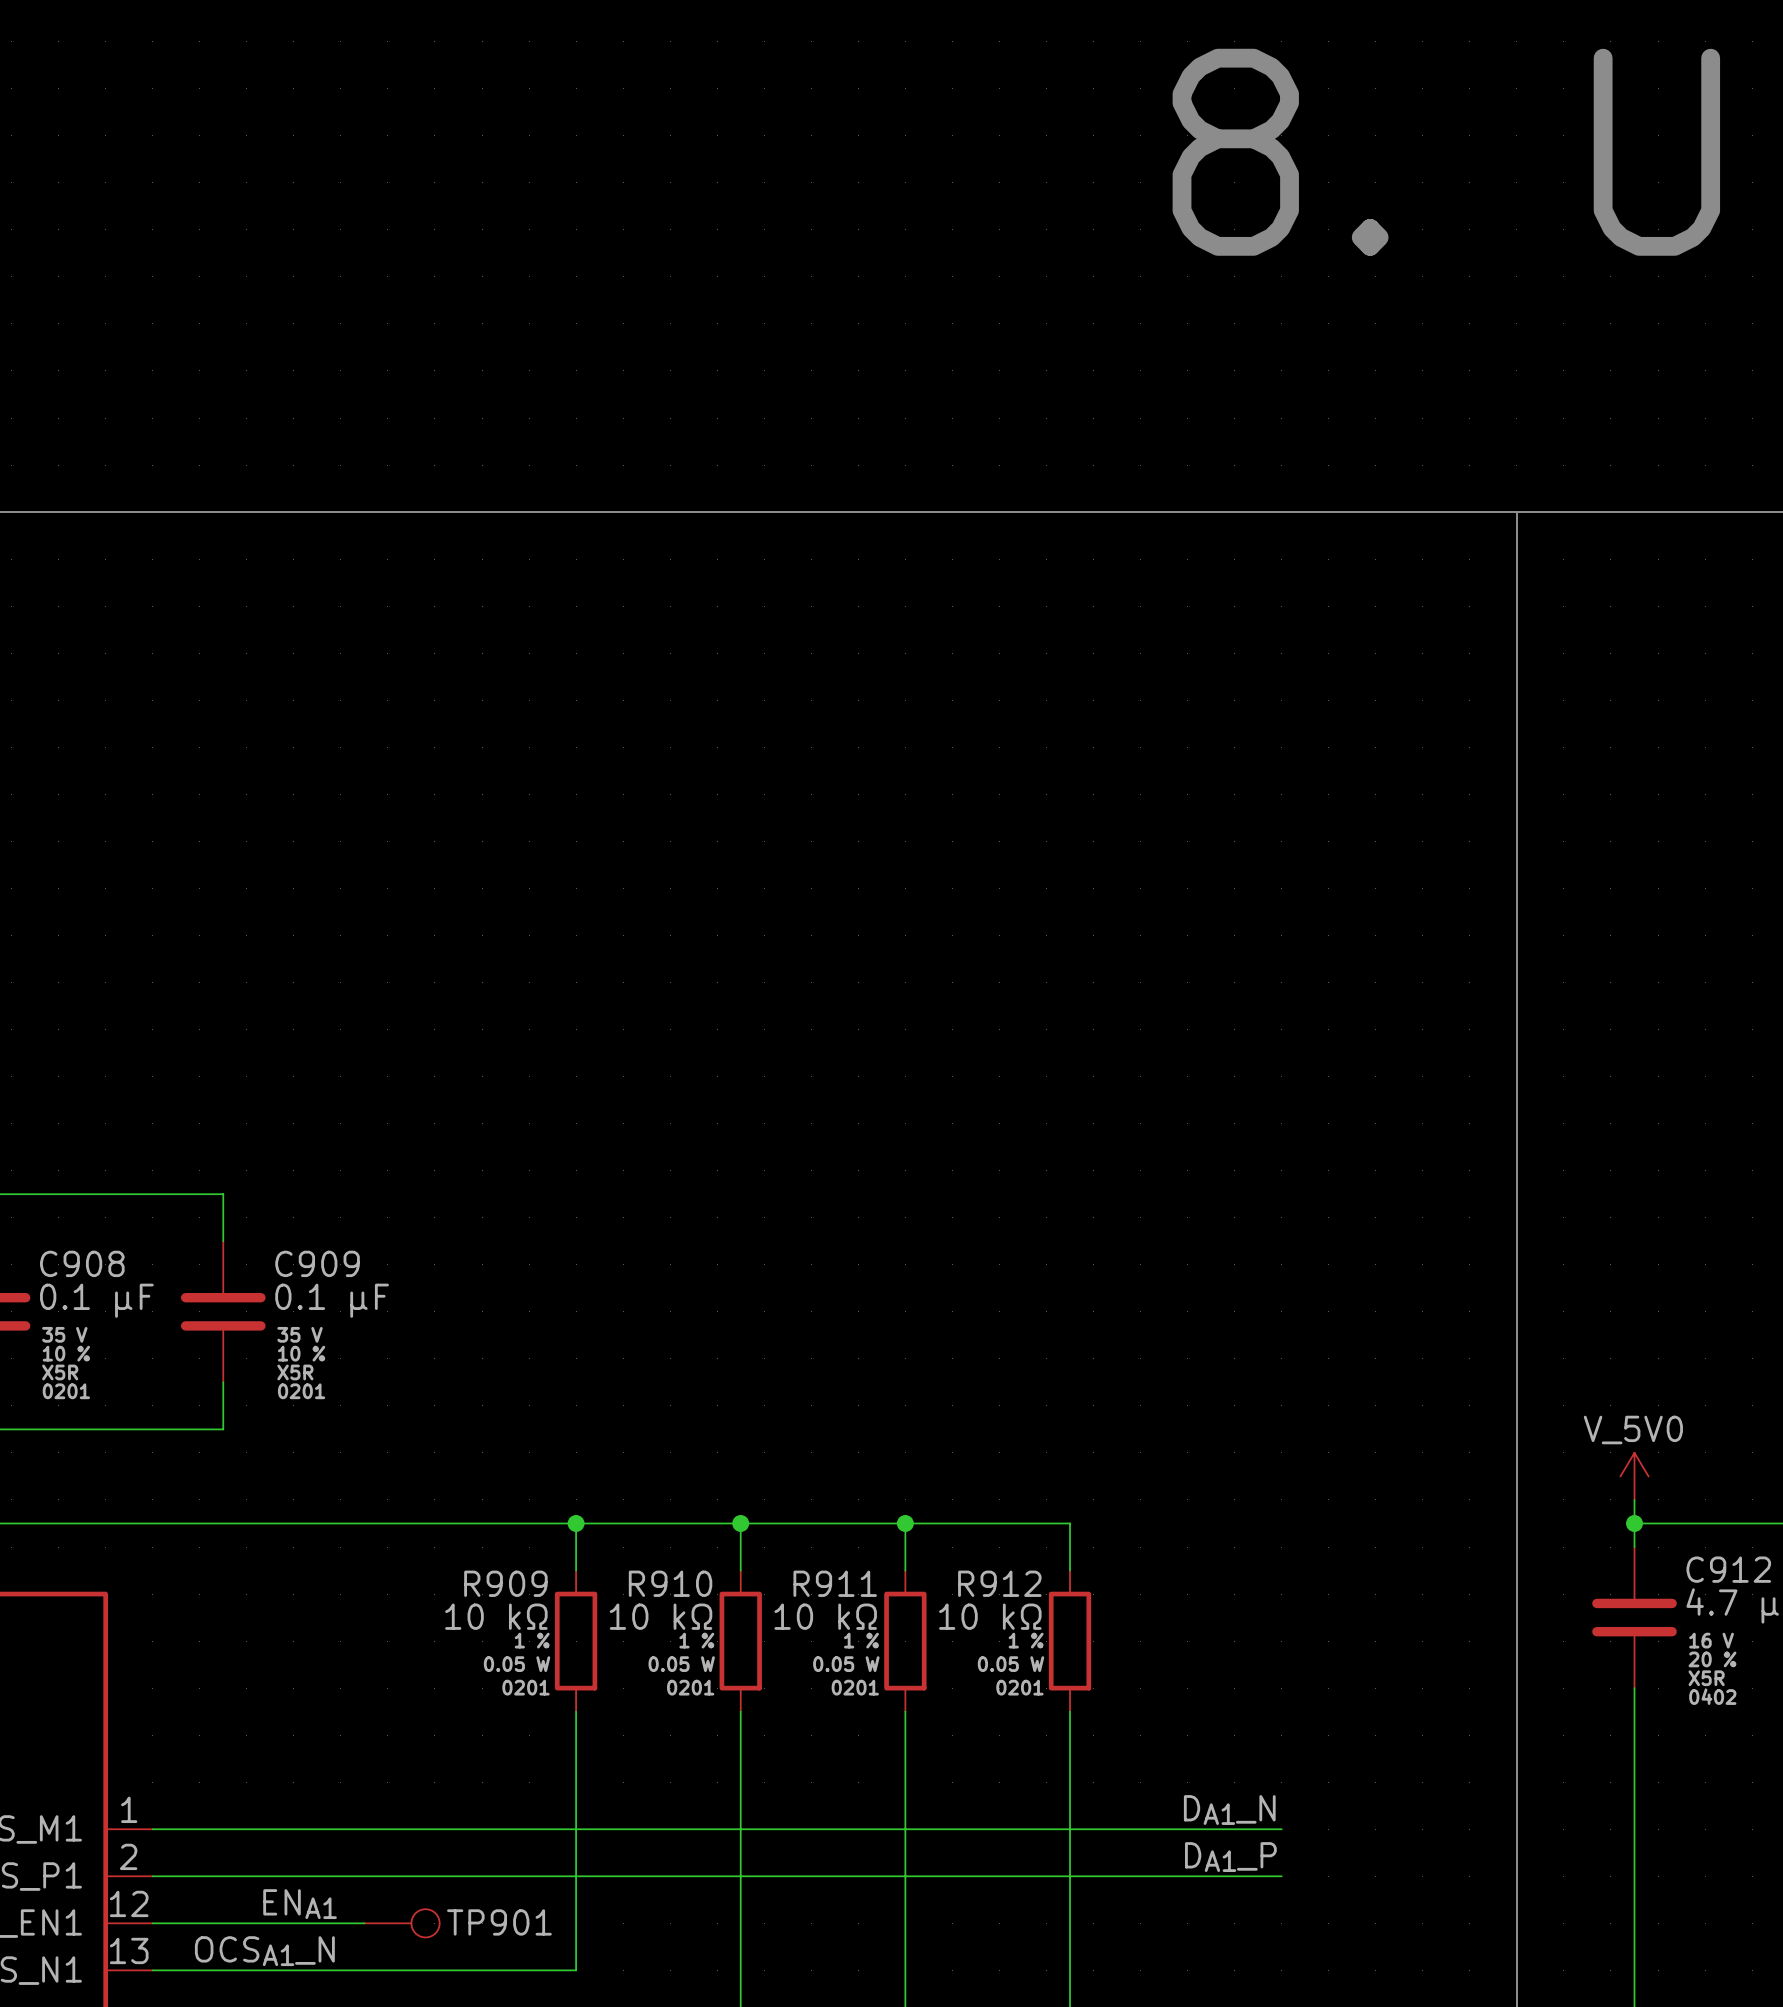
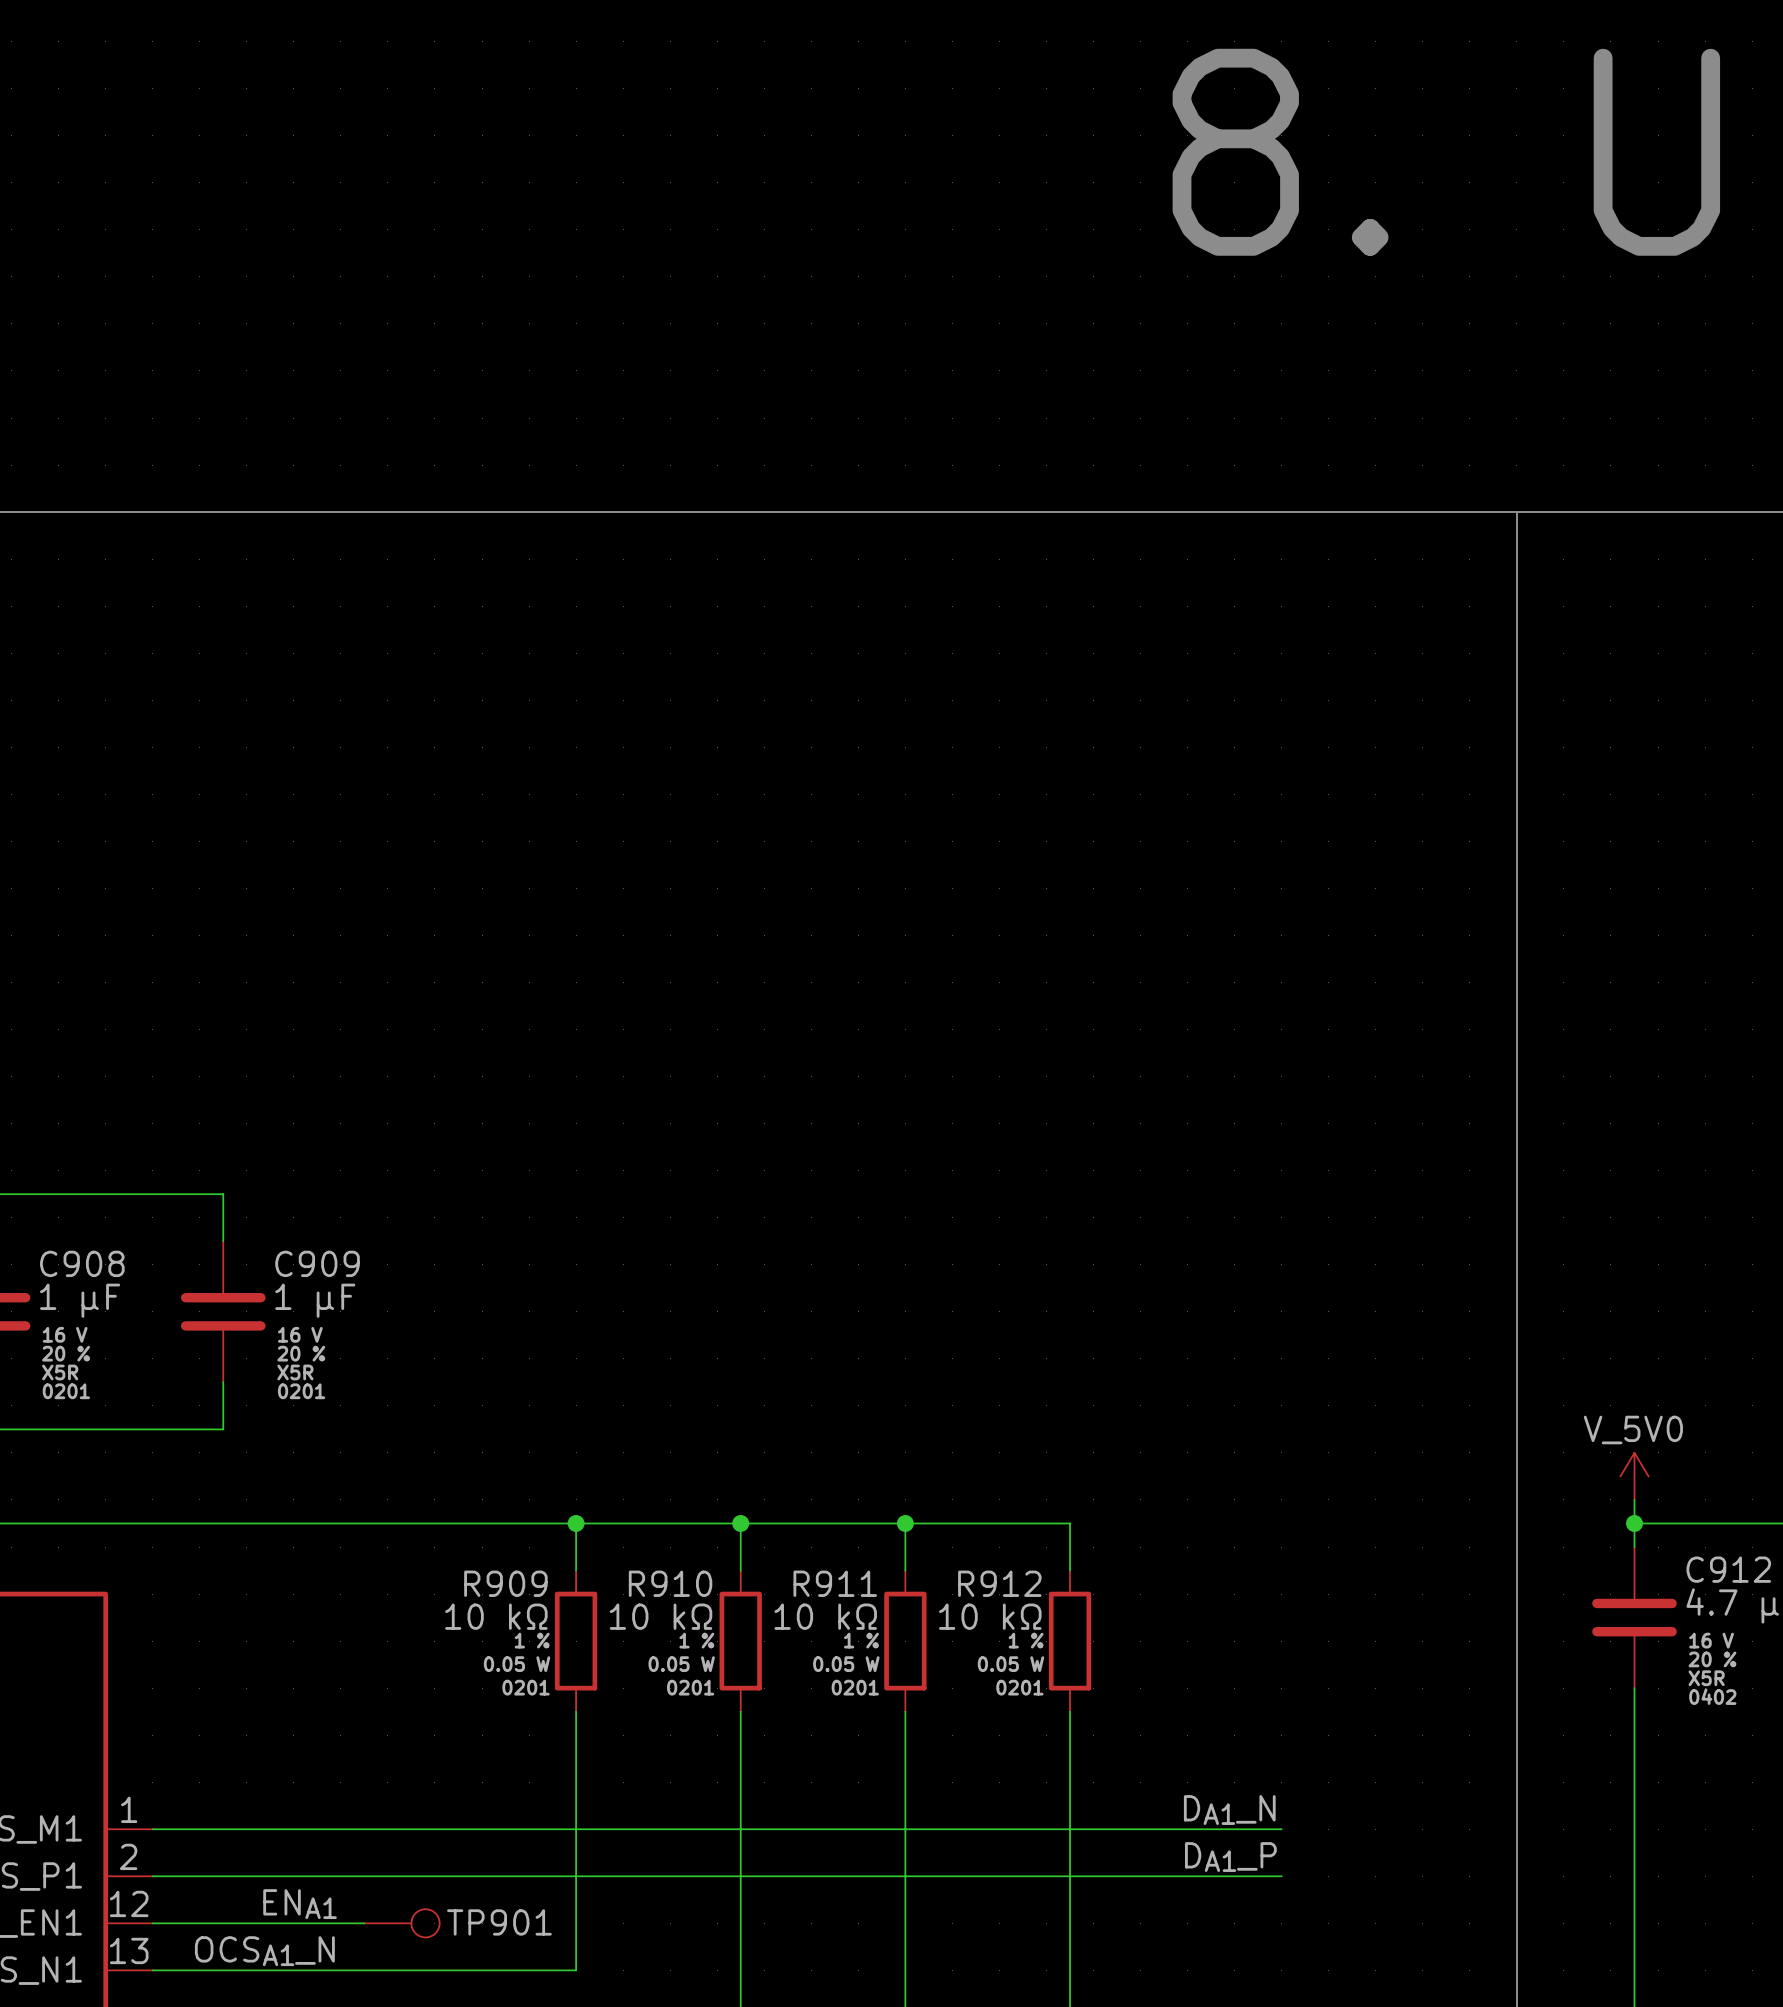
C908 value: 0.1 µF (96, 1300) -> 1 µF (80, 1300)
C909 value: 0.1 µF (332, 1300) -> 1 µF (315, 1300)
C908 text: 35 V (64, 1334) -> 16 V (65, 1334)
C909 text: 35 V (300, 1334) -> 16 V (300, 1334)
C908 text: 10 % (66, 1353) -> 20 % (66, 1353)
C909 text: 10 % (301, 1353) -> 20 % (301, 1353)

